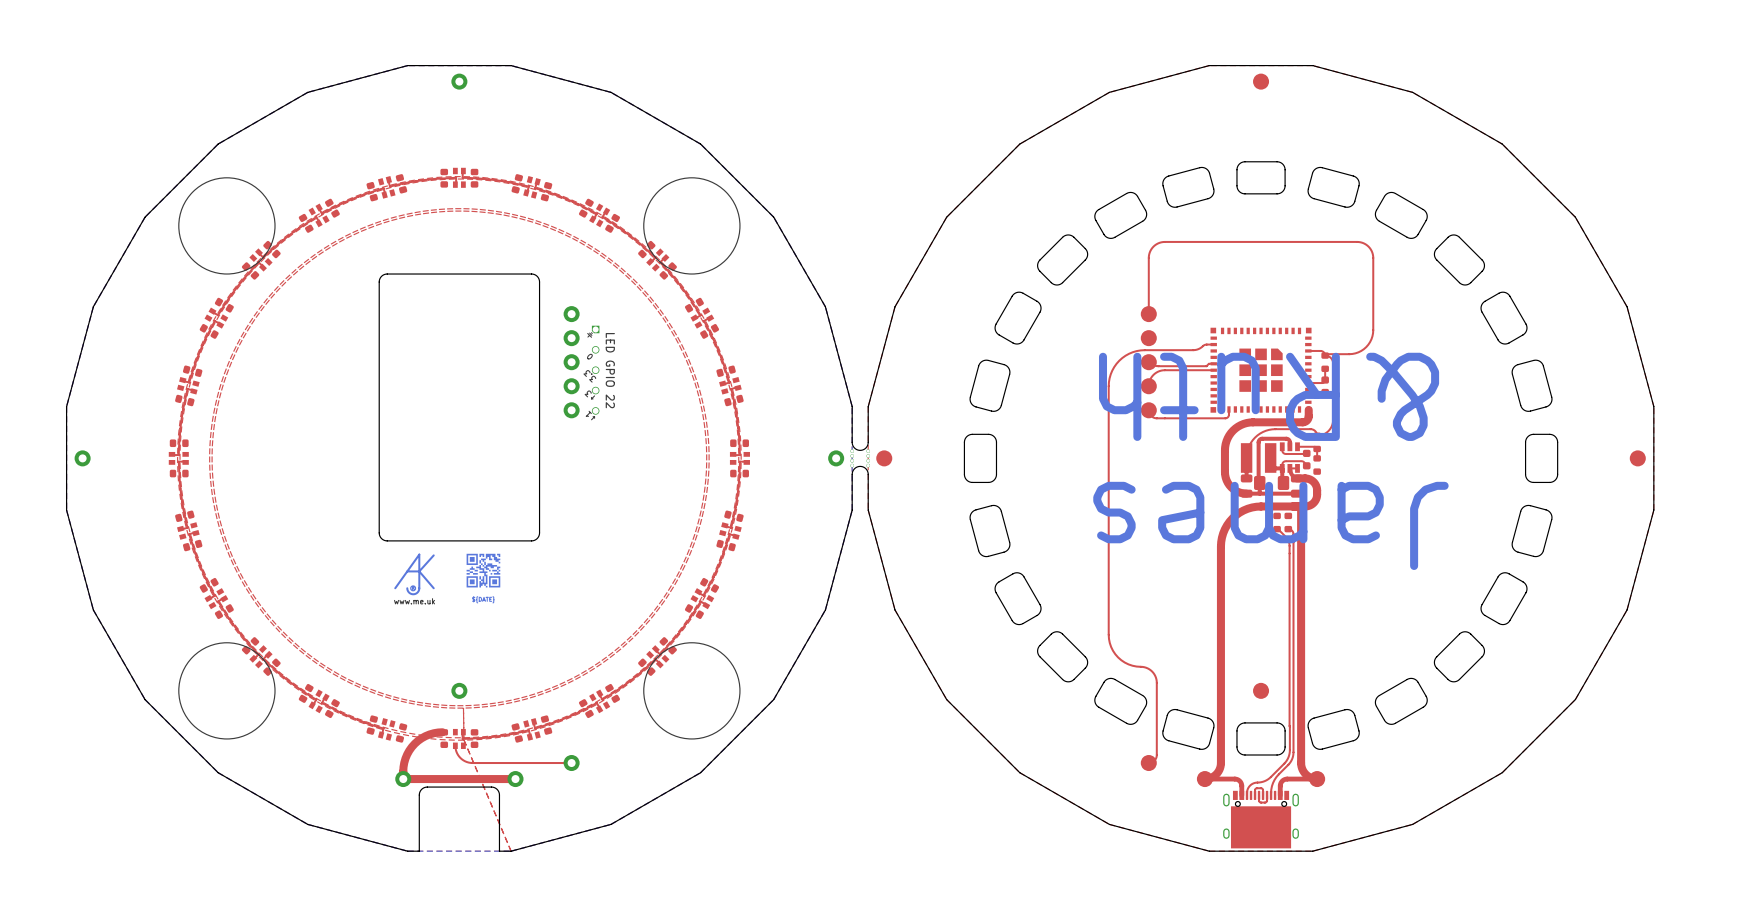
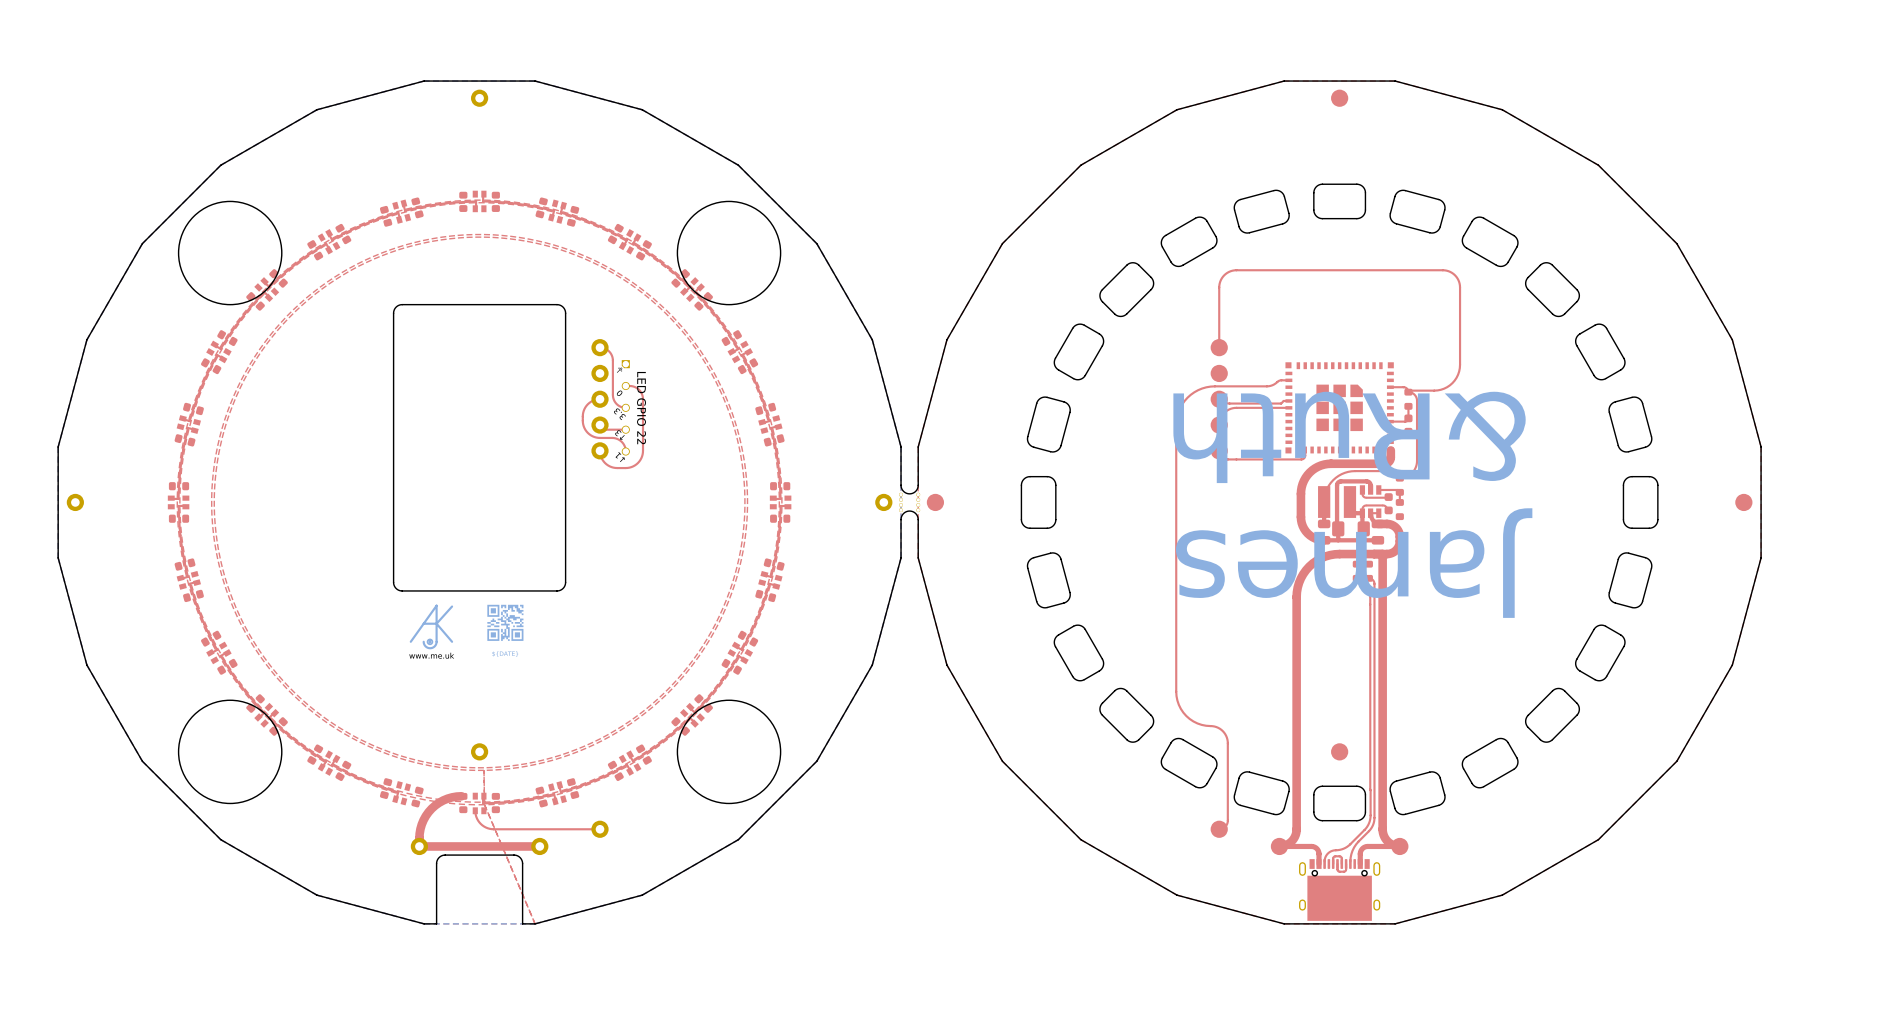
top track: none -> (600, 347) (606, 349) (611, 355) (613, 398) (617, 405) (625, 407)
top track: none -> (625, 386) (636, 387) (642, 395) (642, 456) (633, 466) (615, 467) (605, 463) (600, 450)
top track: none -> (600, 399) (590, 401) (584, 408) (582, 420) (584, 428) (594, 436) (619, 440) (623, 444) (625, 451)
top track: none -> (600, 425) (603, 429) (625, 429)

